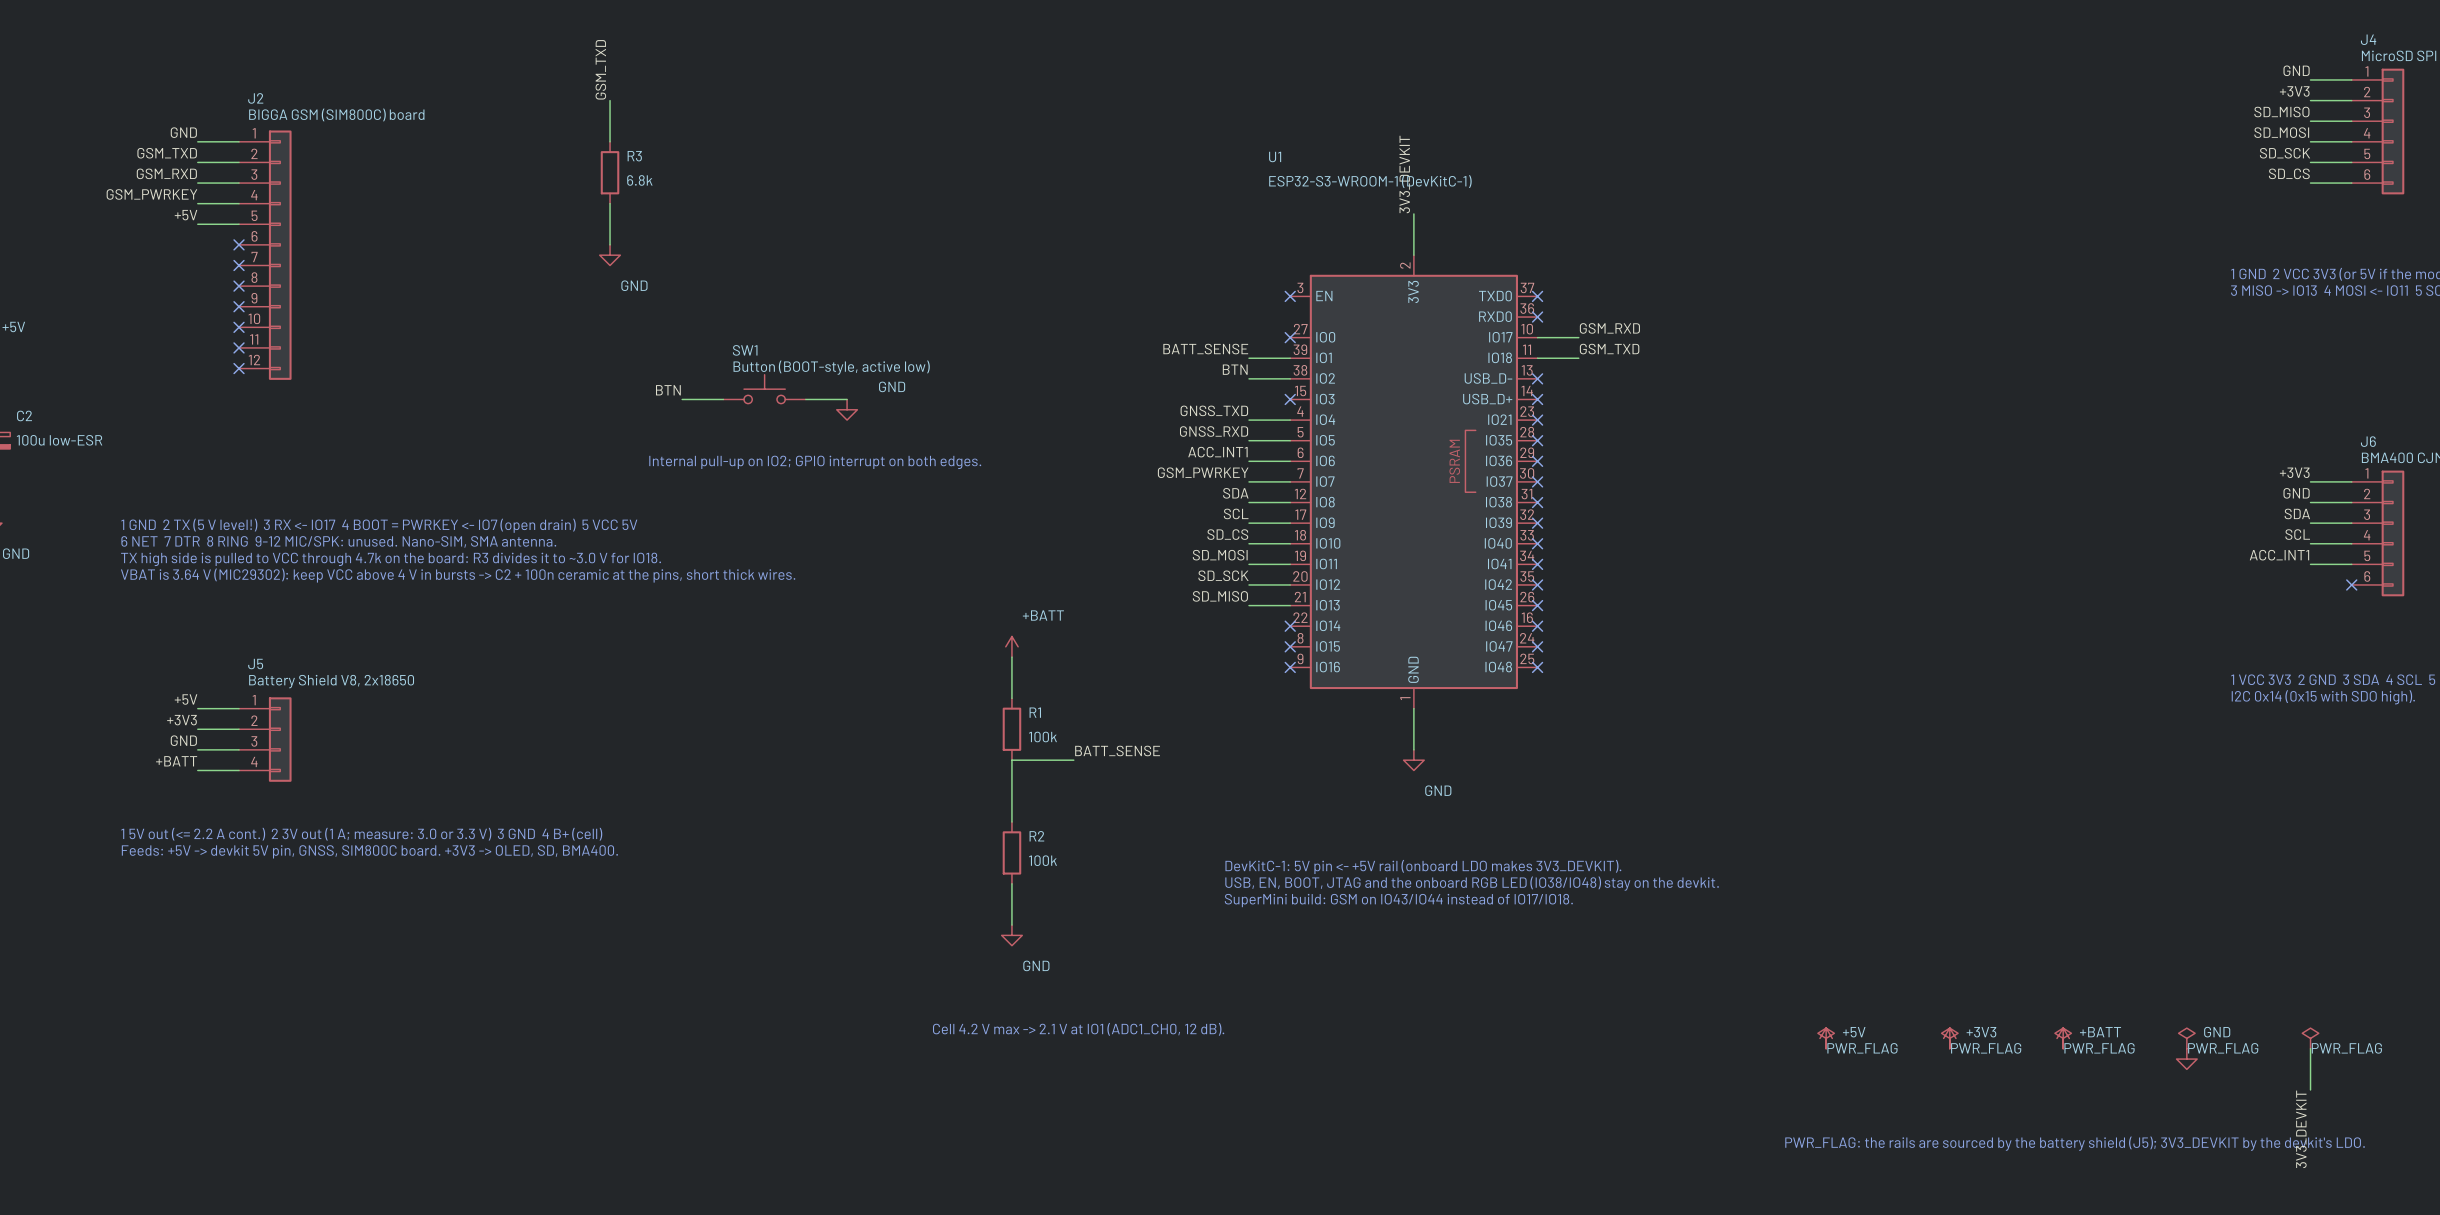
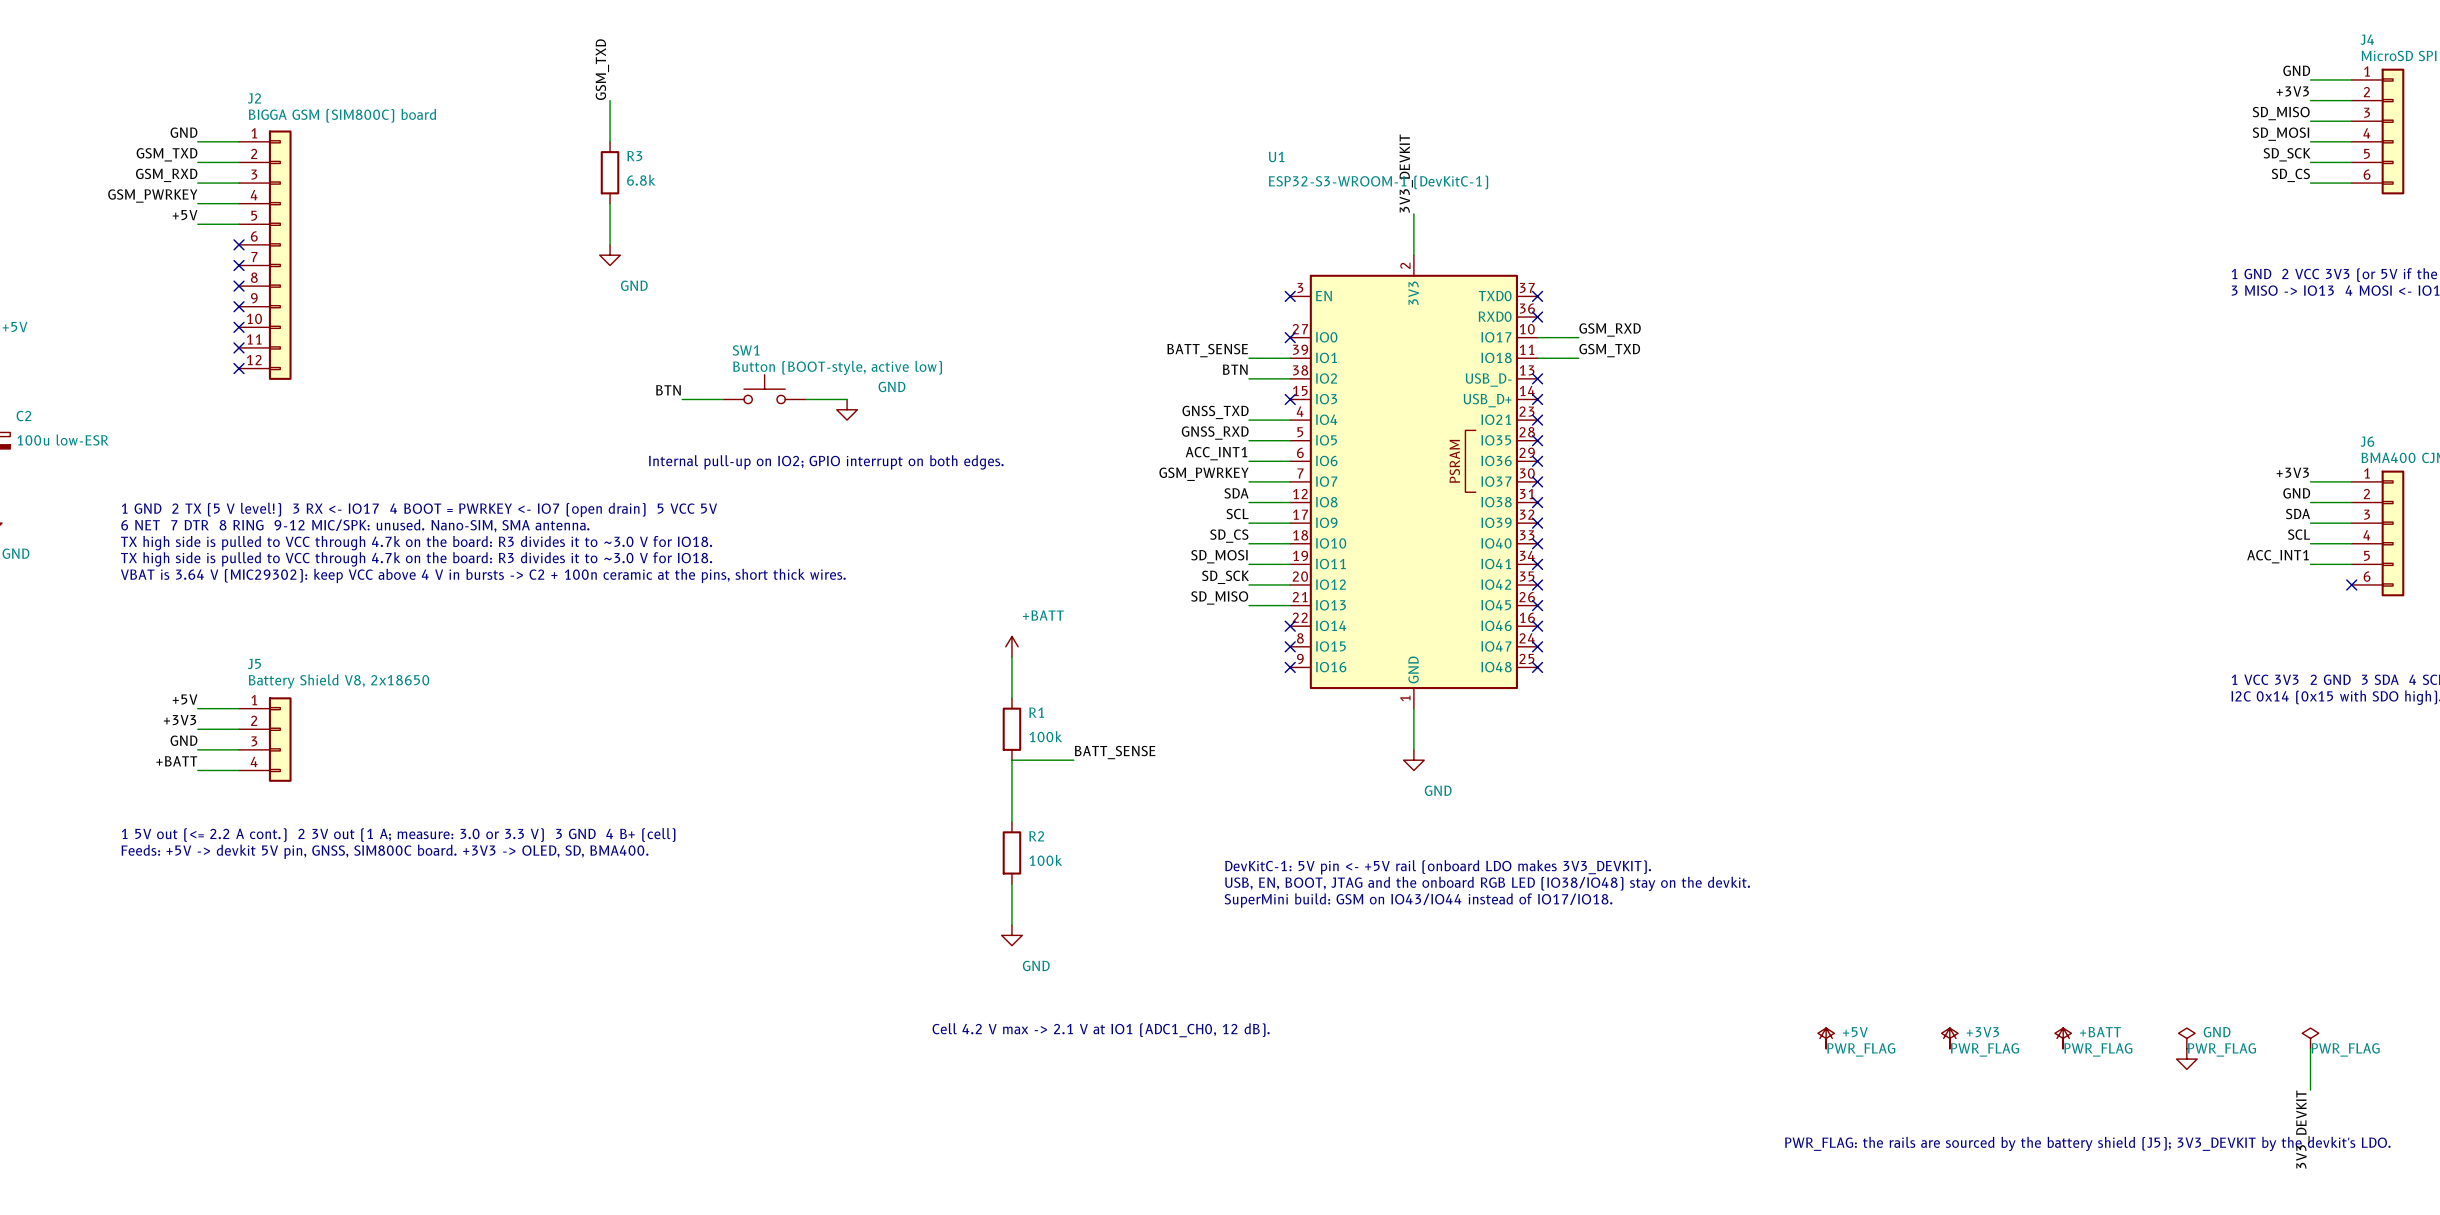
text: none -> 1 GND 2 TX (5 V level!) 3 RX <- IO17 4 BOOT = PWRKEY <- IO7 (open drain) 5 VCC 5V (419, 509)
text: 1 GND 2 TX (5 V level!) 3 RX <- IO17 4 BOOT = PWRKEY <- IO7 (open drain) 5 VCC 5V (379, 525) -> 6 NET 7 DTR 8 RING 9-12 MIC/SPK: unused. Nano-SIM, SMA antenna. (355, 525)
text: 6 NET 7 DTR 8 RING 9-12 MIC/SPK: unused. Nano-SIM, SMA antenna. (338, 541) -> TX high side is pulled to VCC through 4.7k on the board: R3 divides it to ~3.0 V for IO18. (416, 543)

